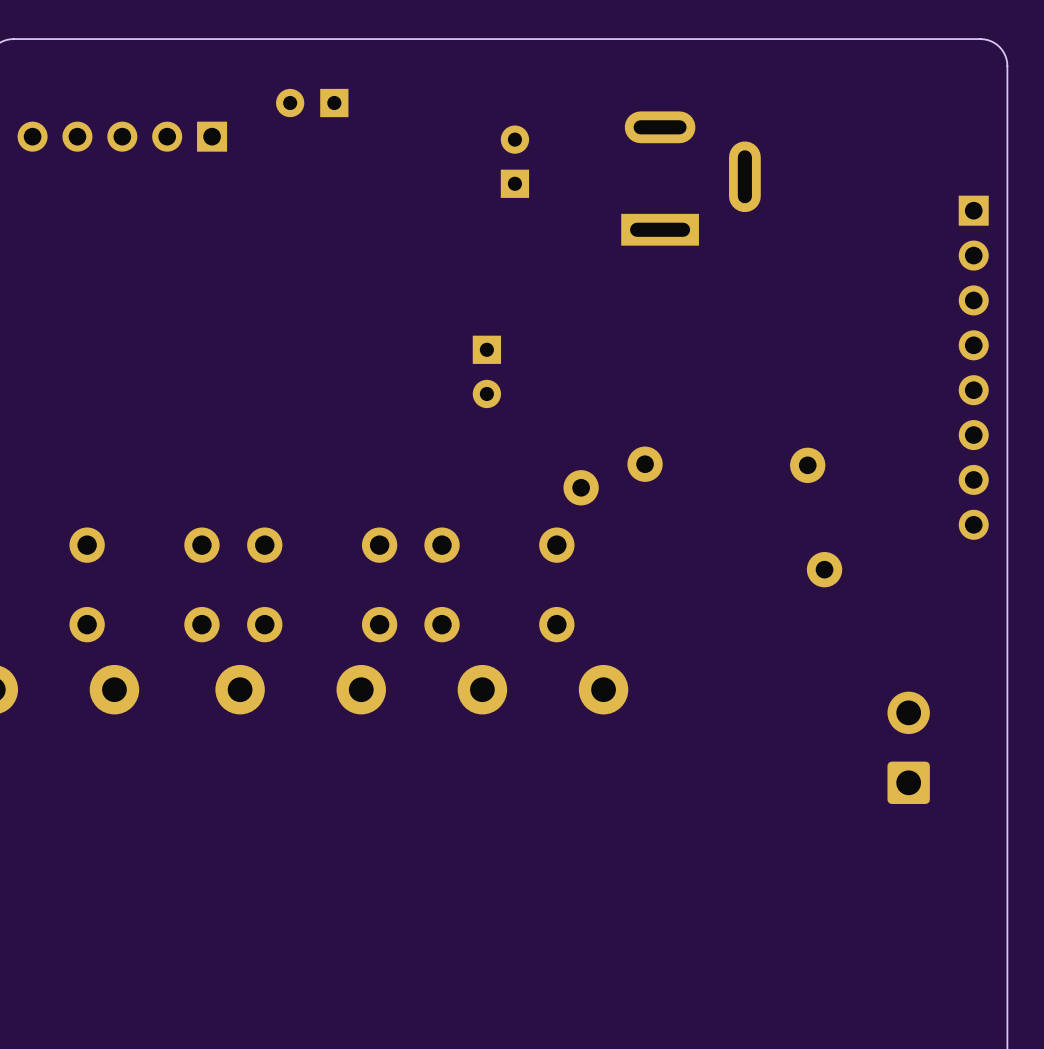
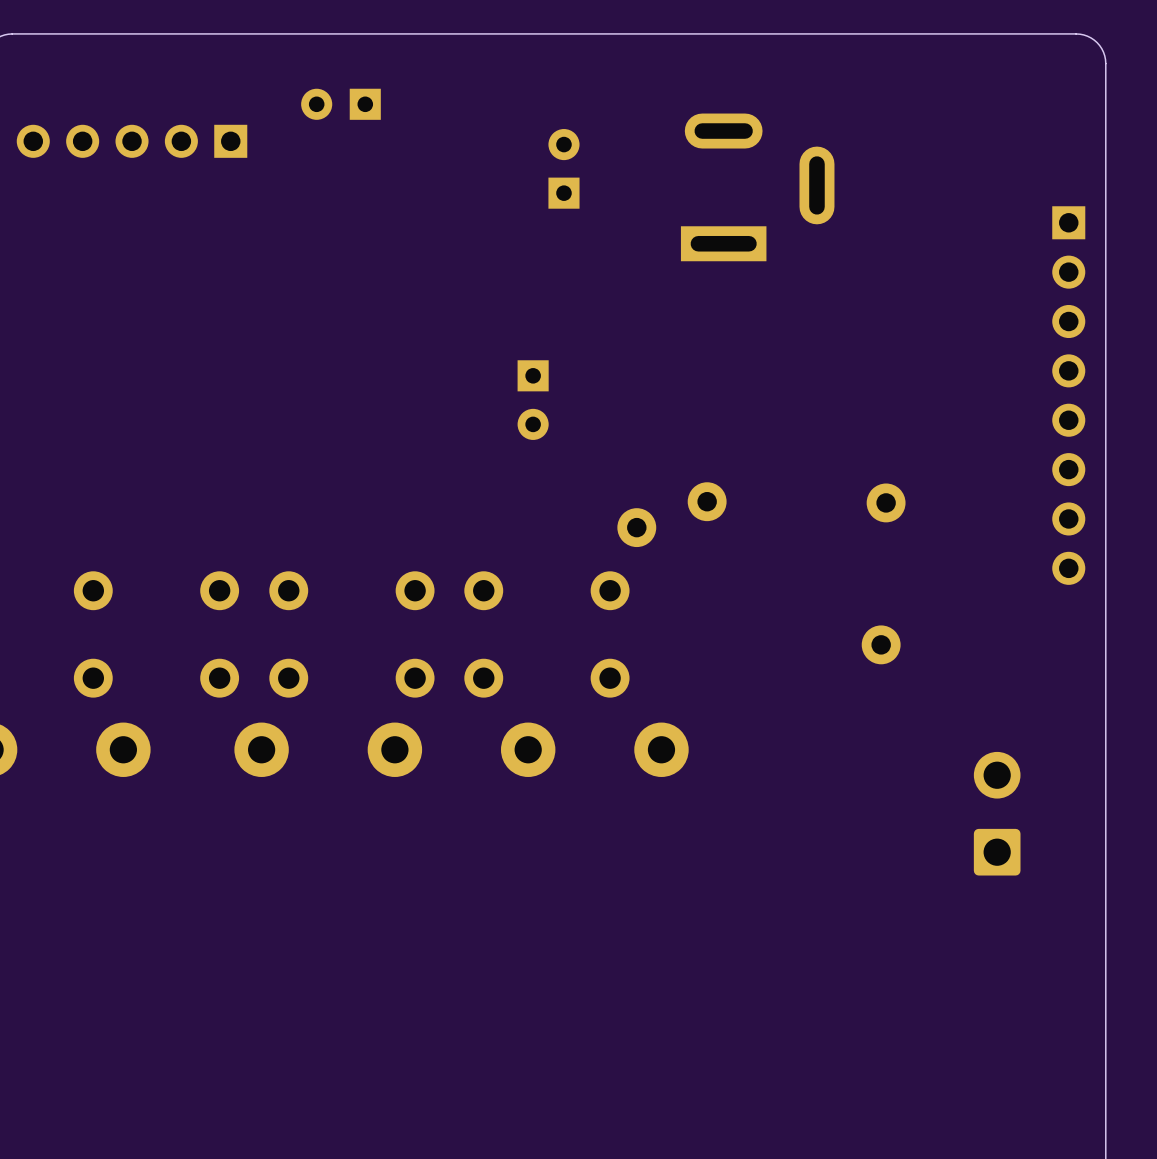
part position: (824, 569) -> (881, 644)

